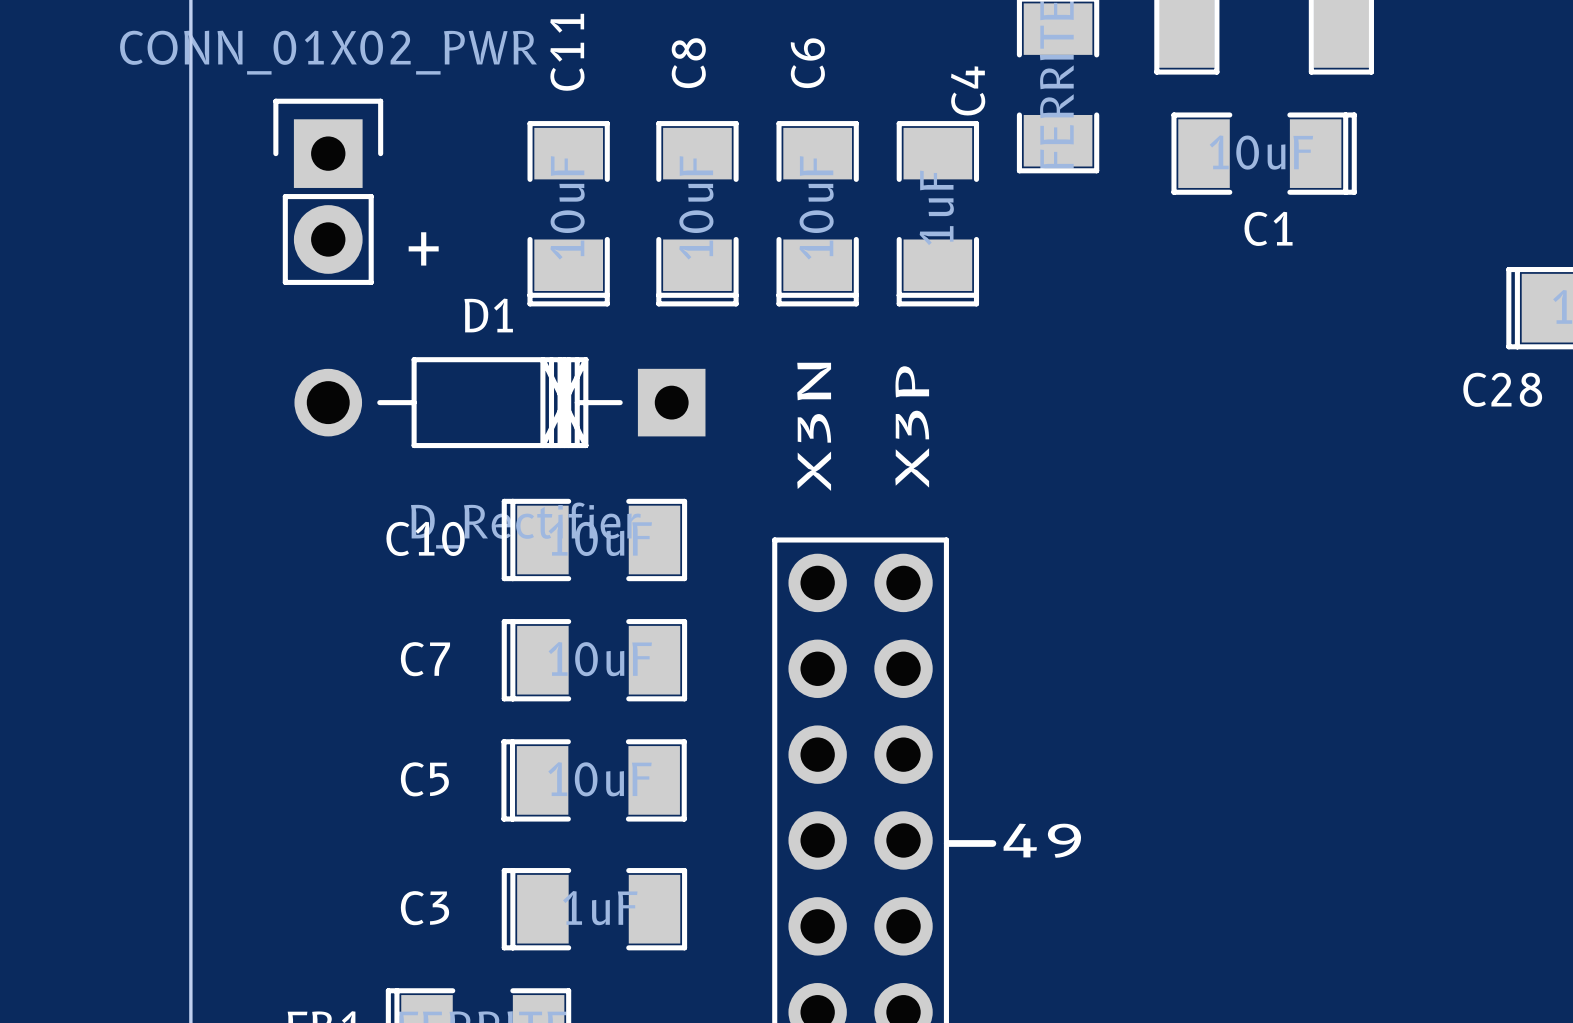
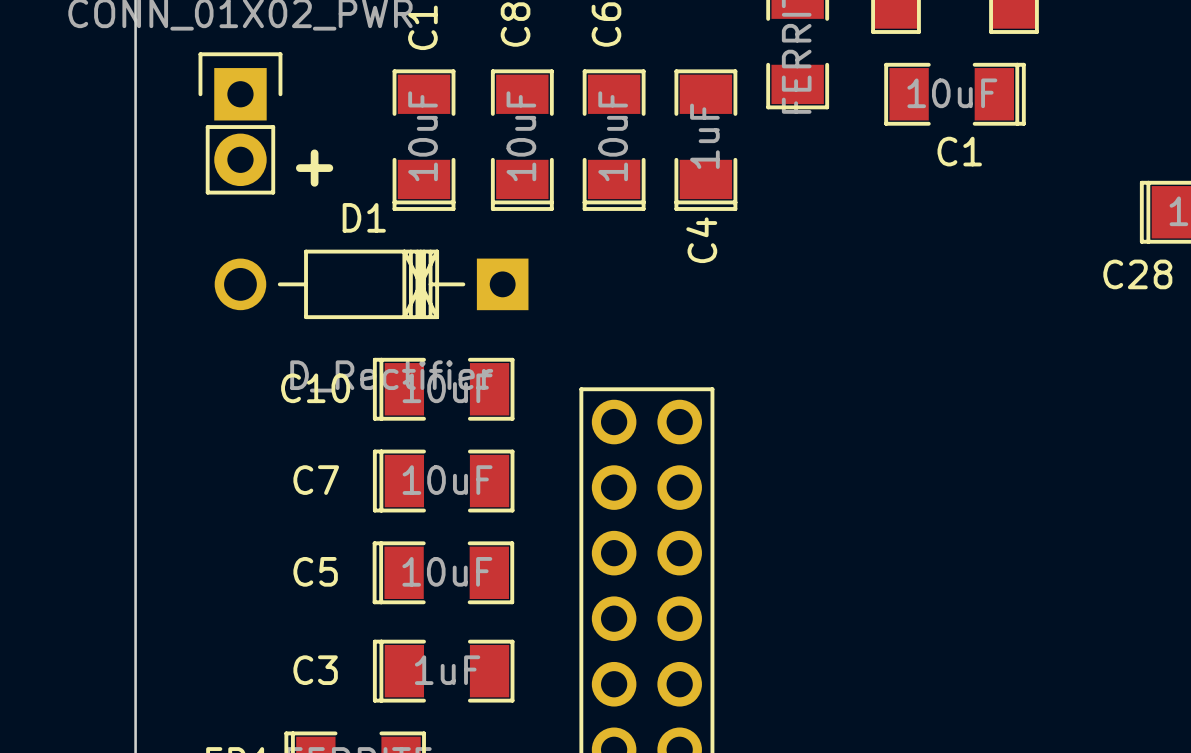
C4 name position: C4 (968, 90) -> C4 (701, 240)
text: X3N (814, 426) -> none
text: X3P (912, 426) -> none
text: 49 (1042, 840) -> none
line: (947, 843) (992, 843) -> none

